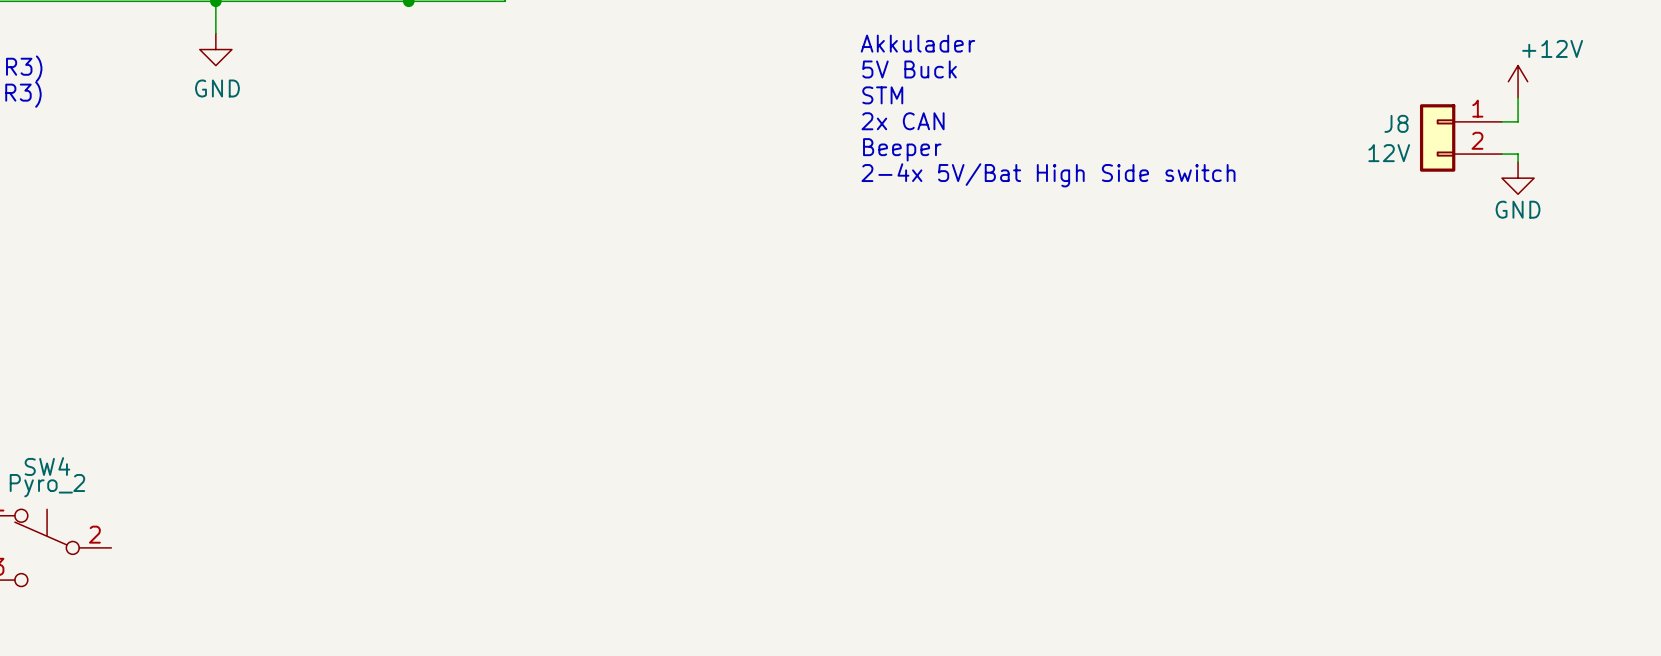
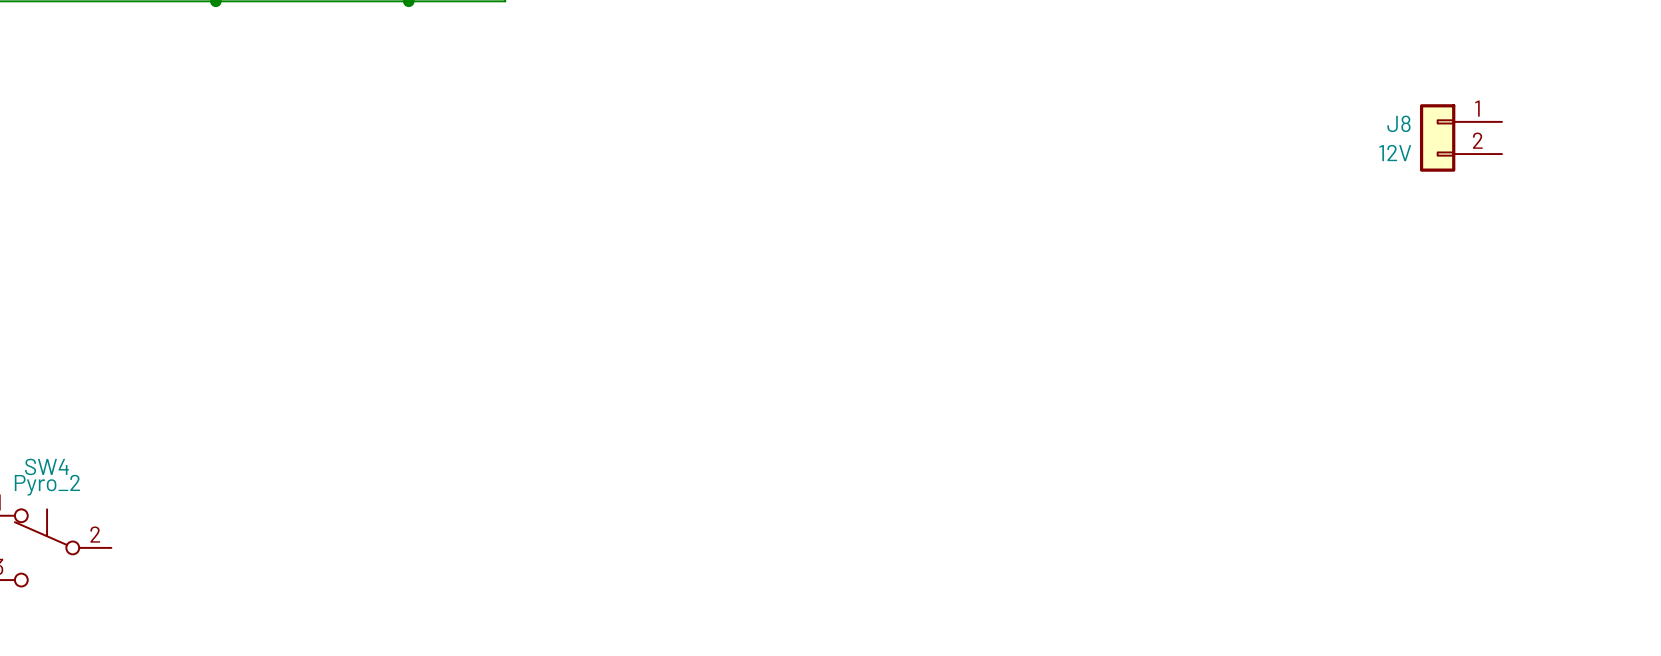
wire: (215, 1) (215, 33) -> none
text: Akkulader (917, 43) -> none
power symbol: GND (215, 49) -> none
text: 5V Buck (909, 69) -> none
power symbol: +12V (1518, 81) -> none
text: STM (882, 95) -> none
wire: (1518, 97) (1518, 121) (1501, 121) -> none
text: 2x CAN (903, 121) -> none
text: Beeper (902, 149) -> none
wire: (1501, 154) (1518, 154) (1518, 162) -> none
text: 2-4x 5V/Bat High Side switch (1048, 175) -> none
power symbol: GND (1518, 178) -> none

